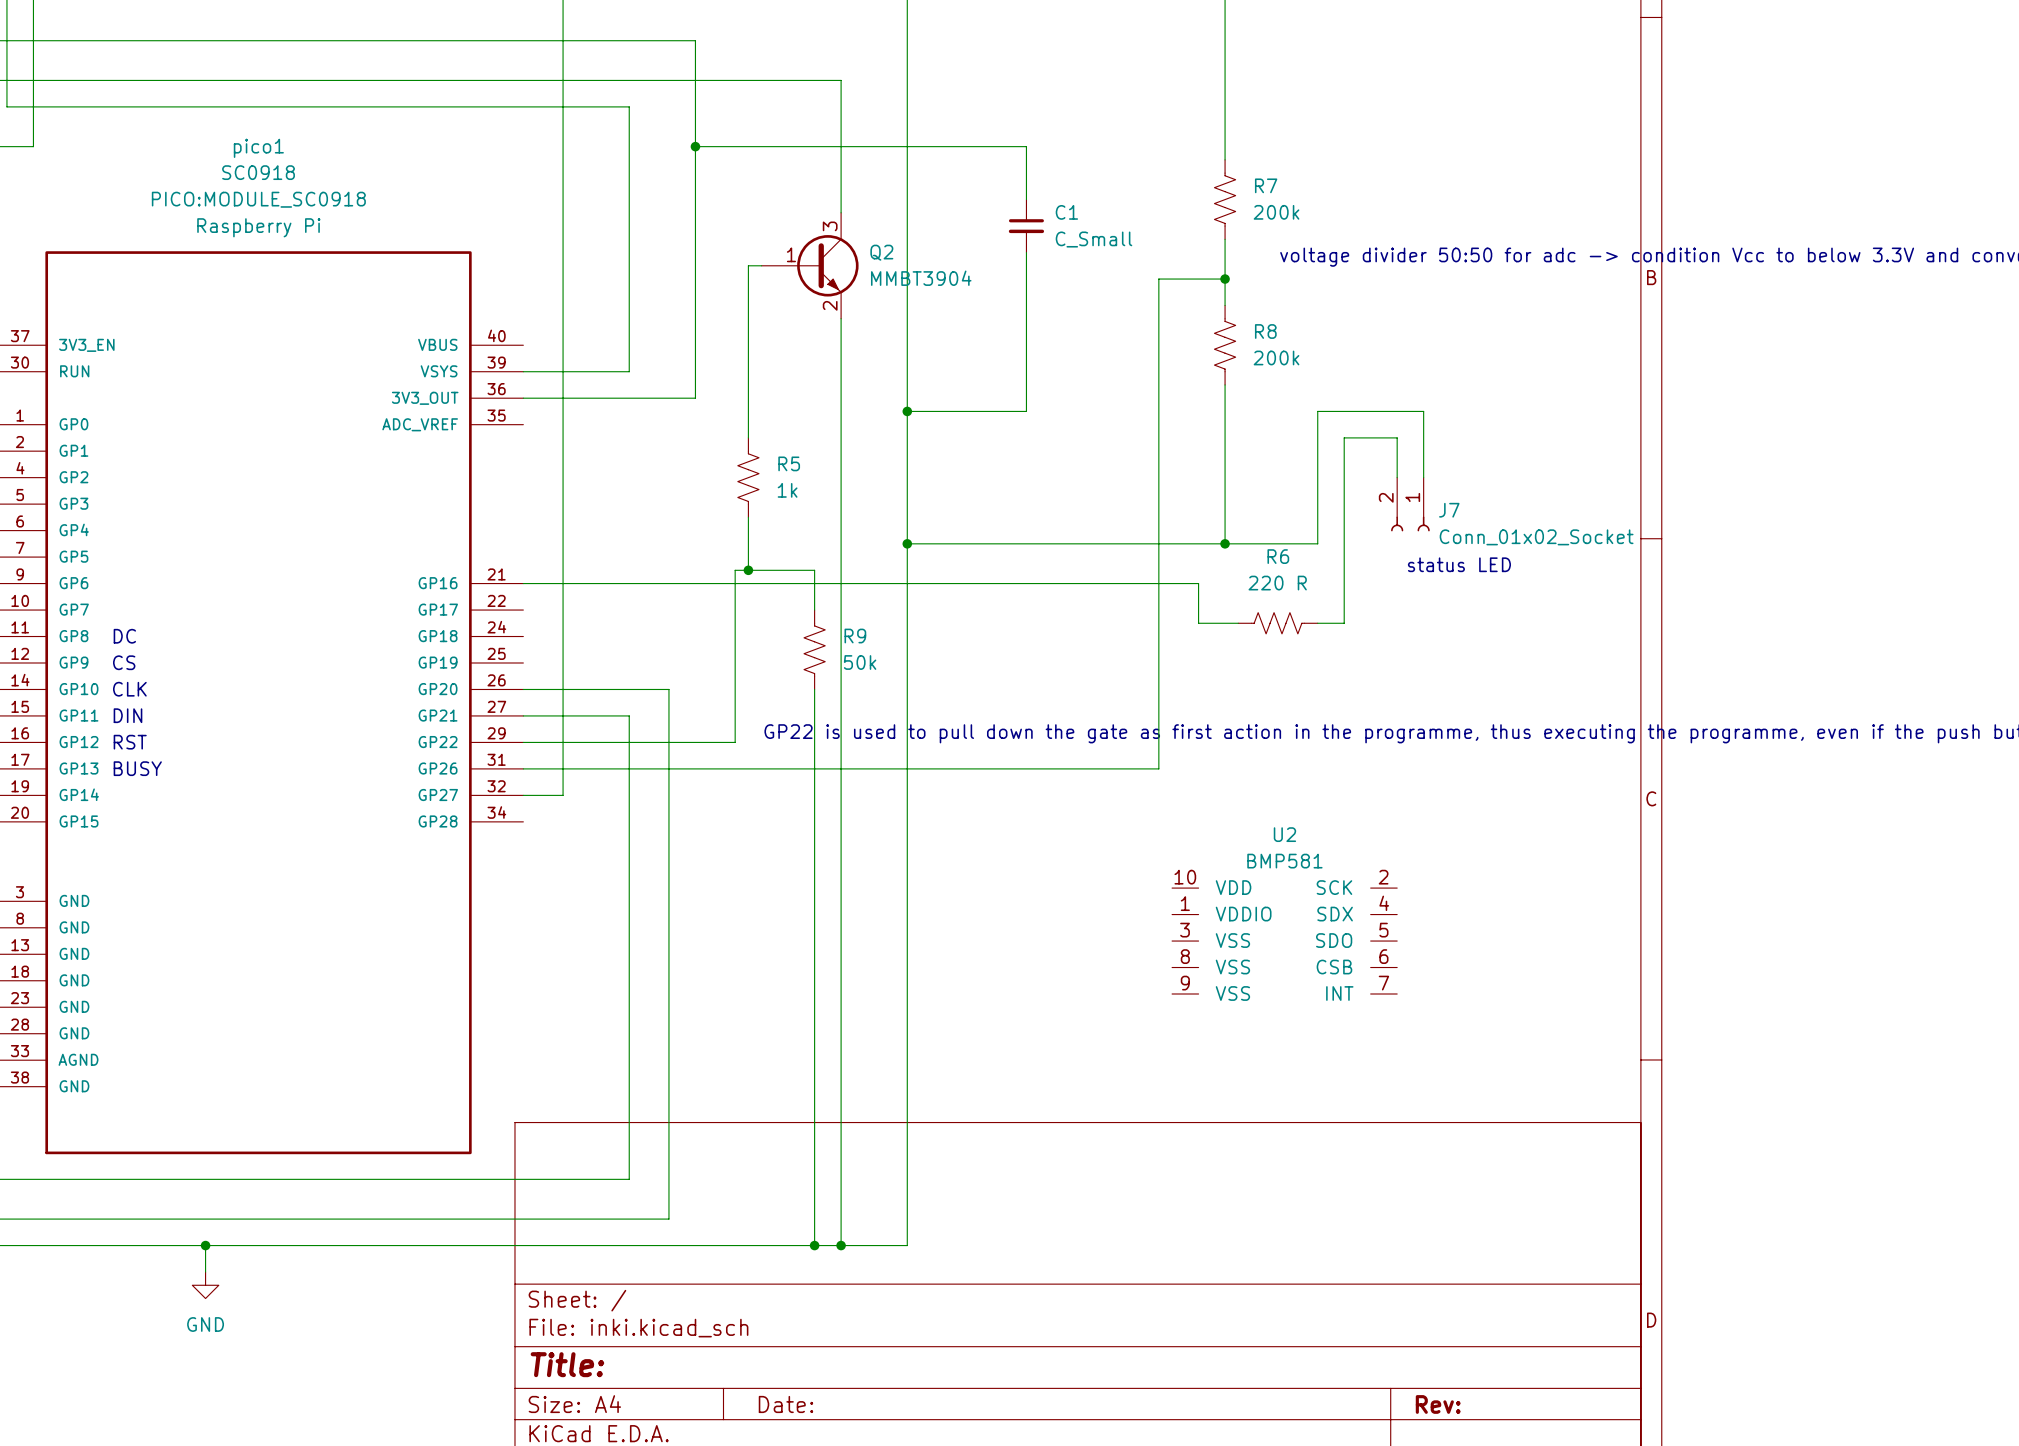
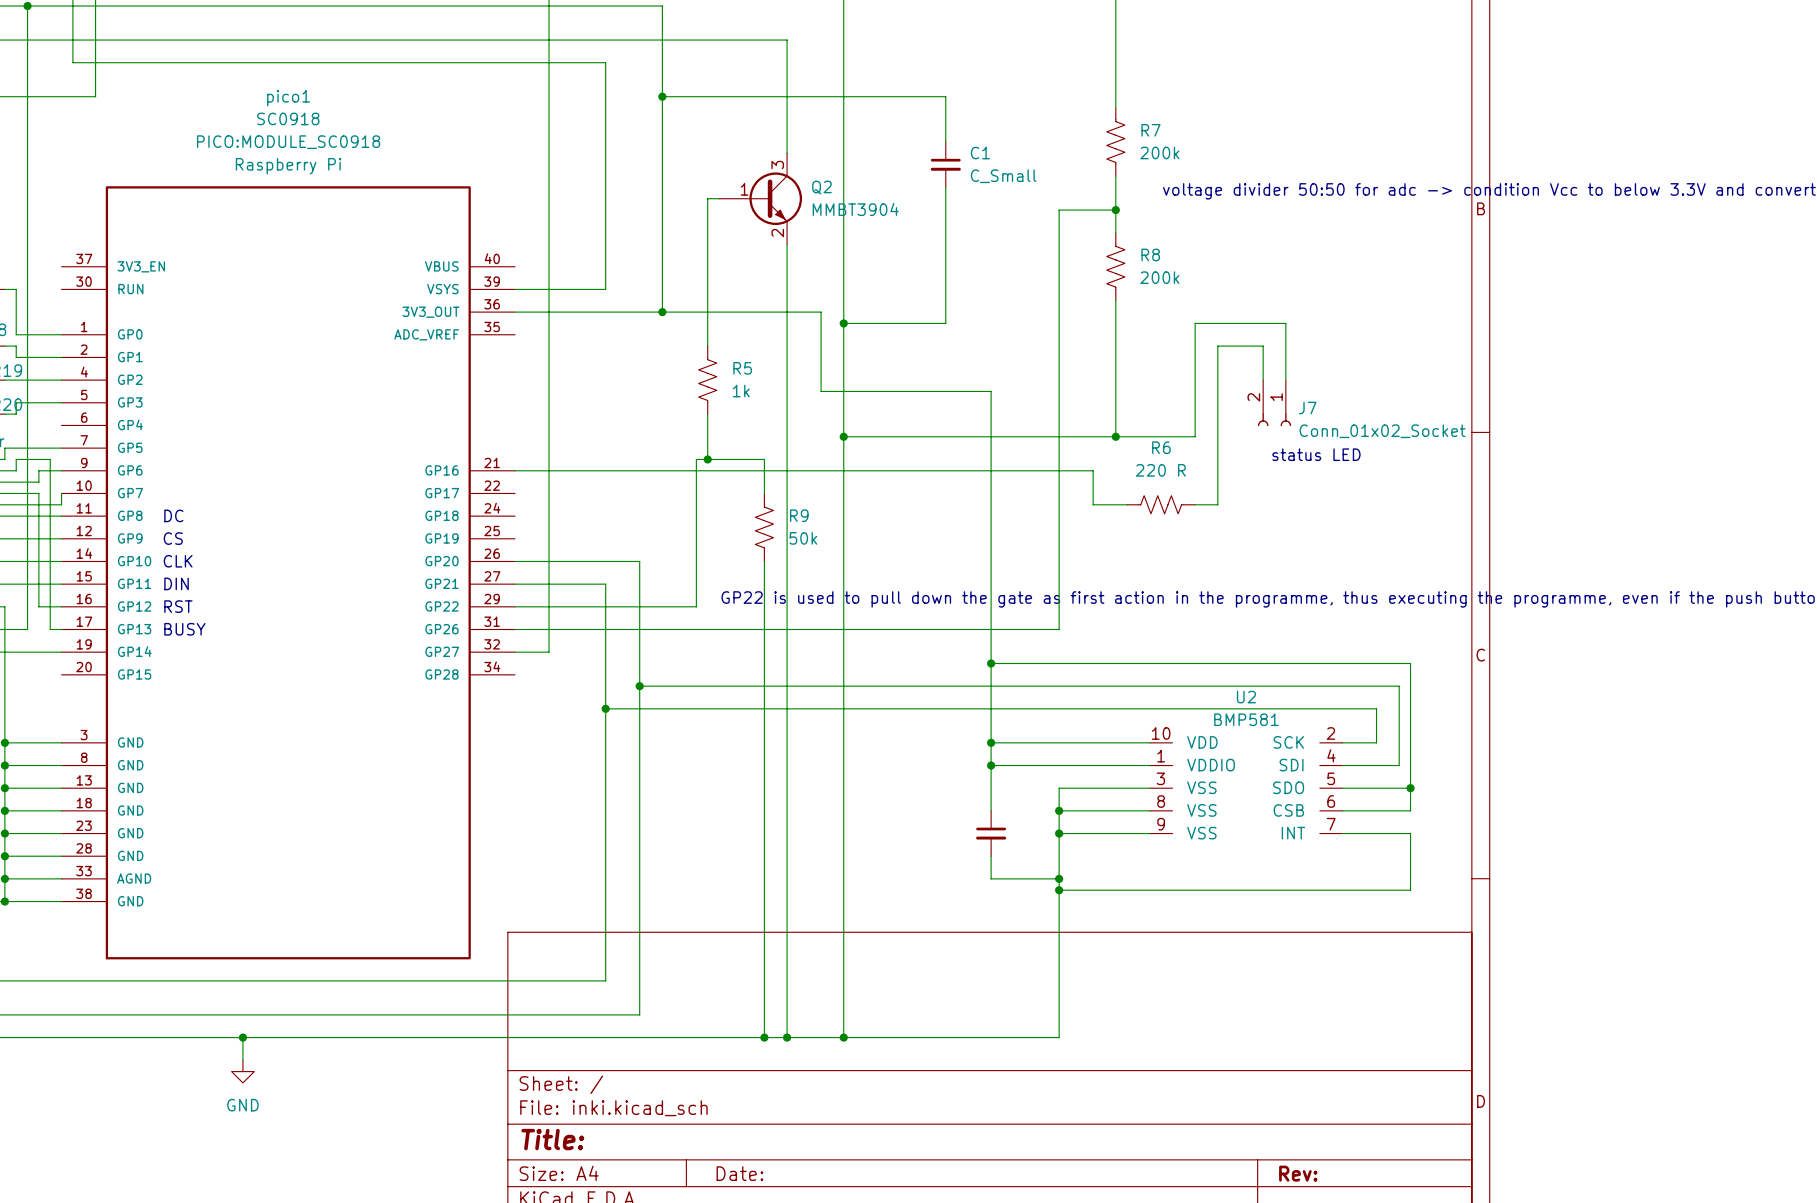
wire: none -> (662, 312) (821, 312) (821, 391) (991, 391) (991, 810)
junction: none -> (662, 312)
wire: none -> (991, 663) (1410, 663) (1410, 810) (1342, 810)
junction: none -> (991, 663)
wire: none -> (639, 686) (1399, 686) (1399, 765) (1342, 765)
junction: none -> (639, 686)
wire: none -> (605, 708) (1376, 708) (1376, 742) (1342, 742)
junction: none -> (605, 708)
wire: none -> (991, 742) (1149, 742)
junction: none -> (991, 742)
U2 pin name: SDX (1335, 914) -> SDI (1291, 765)
wire: none -> (991, 765) (1149, 765)
junction: none -> (991, 765)
U2 position: (1284, 941) -> (1246, 788)
wire: none -> (1149, 788) (1059, 788) (1059, 1037) (843, 1037)
wire: none -> (1342, 788) (1410, 788)
junction: none -> (1410, 788)
wire: none -> (1059, 810) (1149, 810)
junction: none -> (1059, 810)
part: none -> (991, 833)
wire: none -> (1059, 833) (1149, 833)
junction: none -> (1059, 833)
wire: none -> (1342, 833) (1410, 833) (1410, 890) (1059, 890)
wire: none -> (991, 856) (991, 878) (1059, 878)
junction: none -> (1059, 878)
junction: none -> (1059, 890)
junction: none -> (843, 1037)

